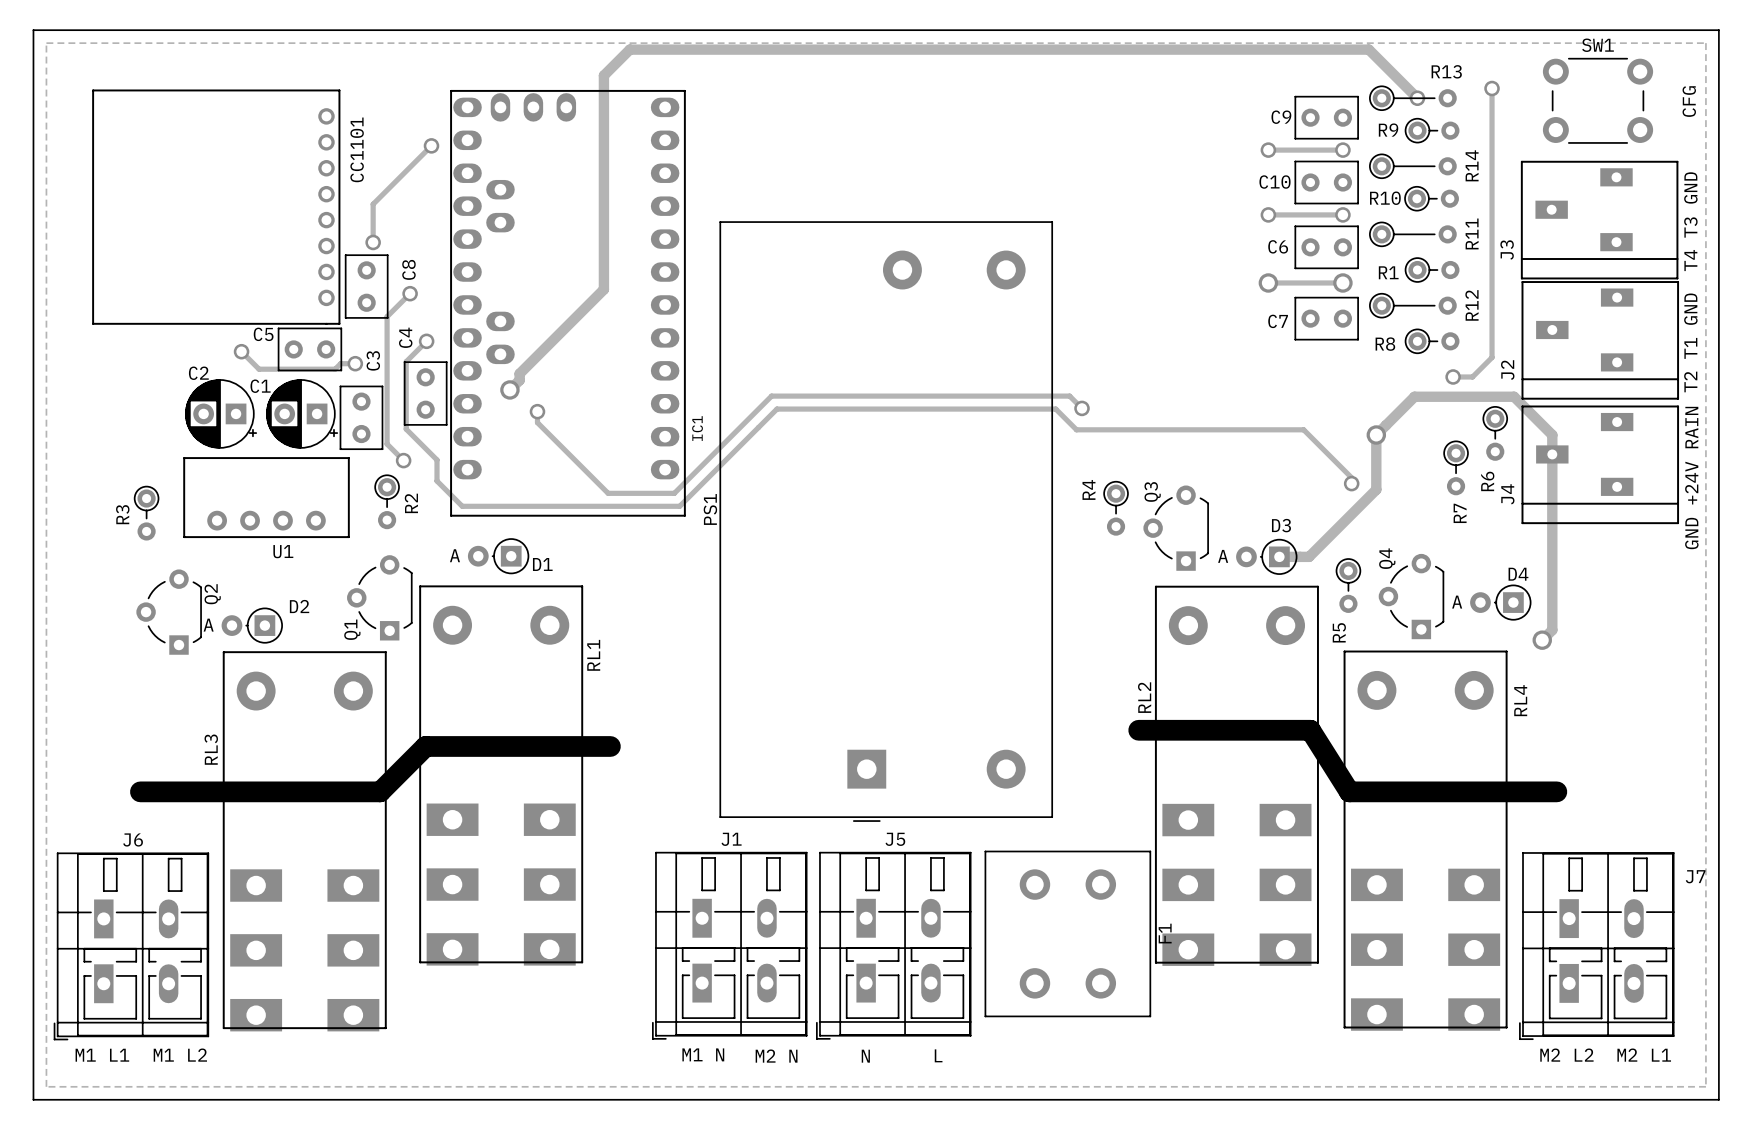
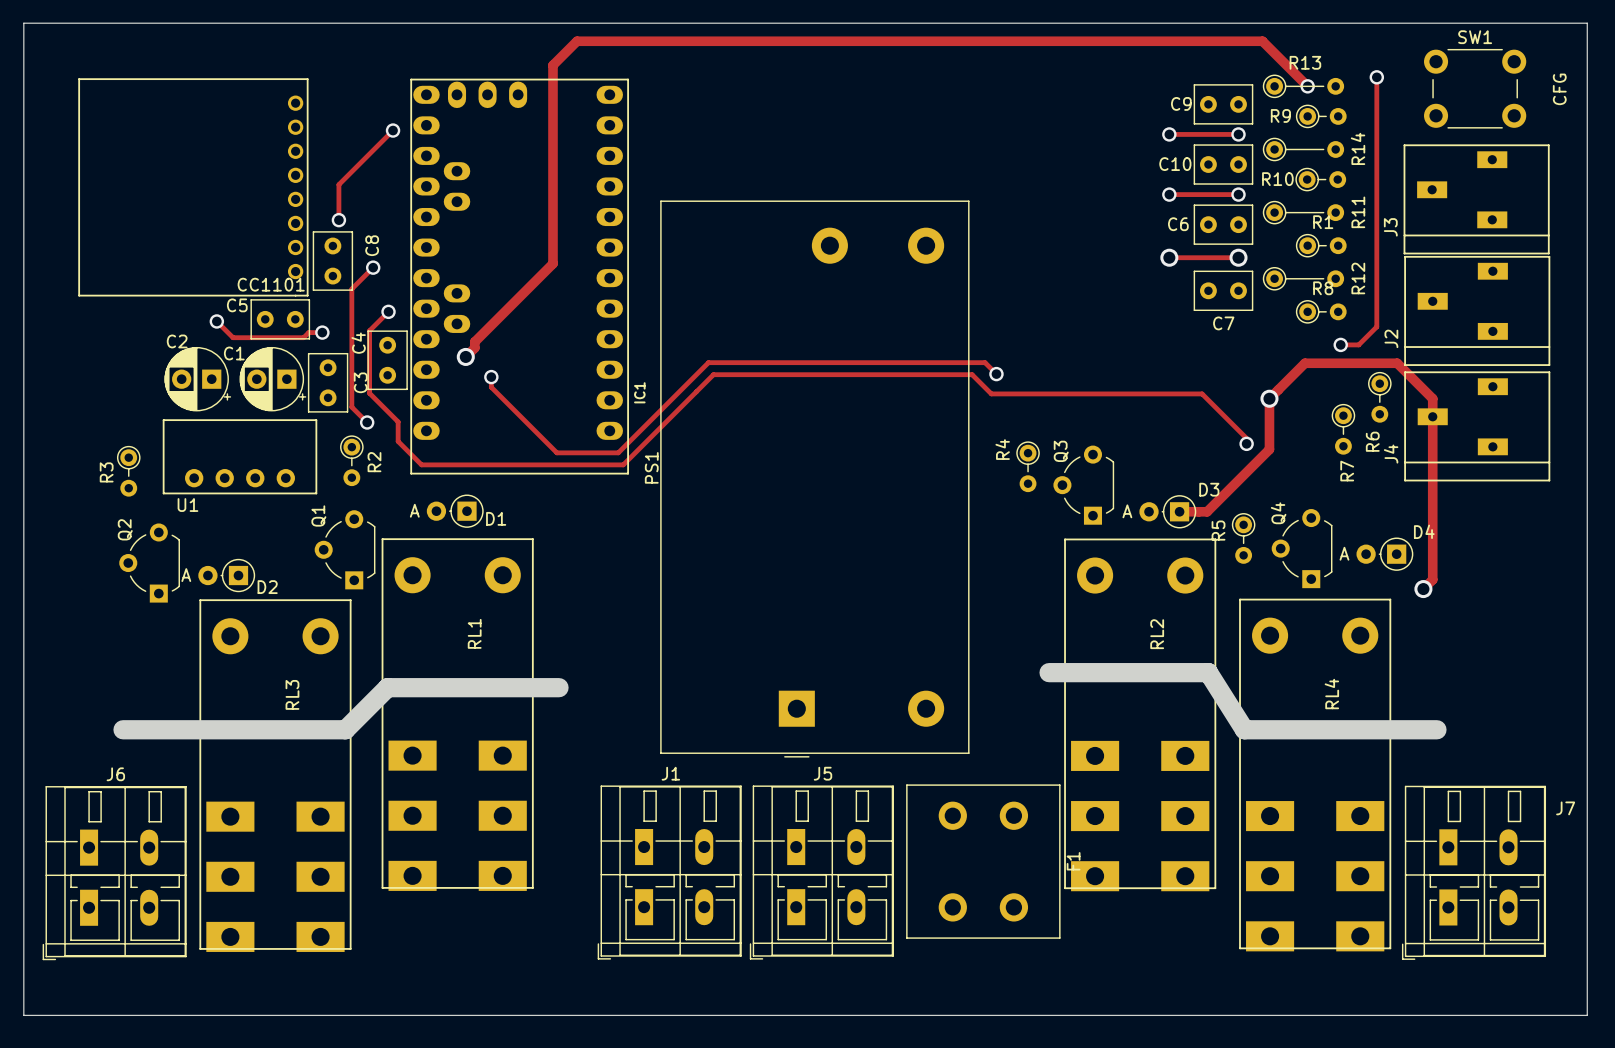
zone outline: (46, 43) (1705, 43) (1705, 1086) (46, 1086) (46, 43) -> none
R13 name position: R13 (1446, 71) -> R13 (1305, 62)
part text rotation: 0° (357, 149) -> 90° clockwise (271, 284)
part text position: CC1101 (357, 149) -> CC1101 (271, 284)
text: T4 T3 GND (1690, 221) -> none
R1 name position: R1 (1388, 272) -> R1 (1323, 222)
C7 name position: C7 (1278, 321) -> C7 (1223, 323)
C4 name position: C4 (405, 337) -> C4 (358, 343)
text: T2 T1 GND (1690, 342) -> none
R8 name position: R8 (1385, 344) -> R8 (1323, 288)
C3 name position: C3 (373, 360) -> C3 (360, 382)
text: GND +24V RAIN (1691, 478) -> none
D3 name position: D3 (1281, 525) -> D3 (1209, 489)
U1 name position: U1 (283, 551) -> U1 (187, 505)
D4 name position: D4 (1518, 574) -> D4 (1424, 531)
Q2 name position: Q2 (212, 594) -> Q2 (125, 529)
D2 name position: D2 (299, 606) -> D2 (267, 587)
Q1 name position: Q1 (352, 629) -> Q1 (318, 515)
R5 name position: R5 (1339, 632) -> R5 (1218, 530)
RL1 name position: RL1 (593, 655) -> RL1 (474, 633)
RL2 name position: RL2 (1144, 697) -> RL2 (1157, 634)
RL4 name position: RL4 (1520, 700) -> RL4 (1331, 694)
RL3 name position: RL3 (211, 749) -> RL3 (292, 694)
text: M1 N (703, 1054) -> none
text: M1 L1 (102, 1055) -> none
text: M1 L2 (180, 1055) -> none
text: L (938, 1055) -> none
text: M2 L2 (1566, 1055) -> none
text: M2 L1 (1644, 1055) -> none
text: M2 N (776, 1056) -> none
text: N (865, 1056) -> none

